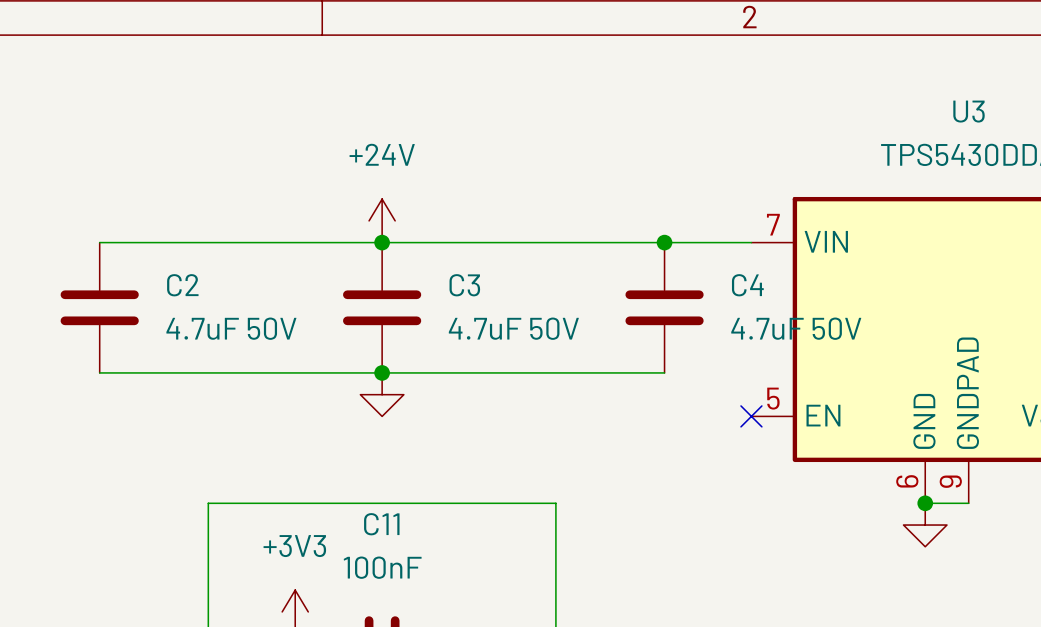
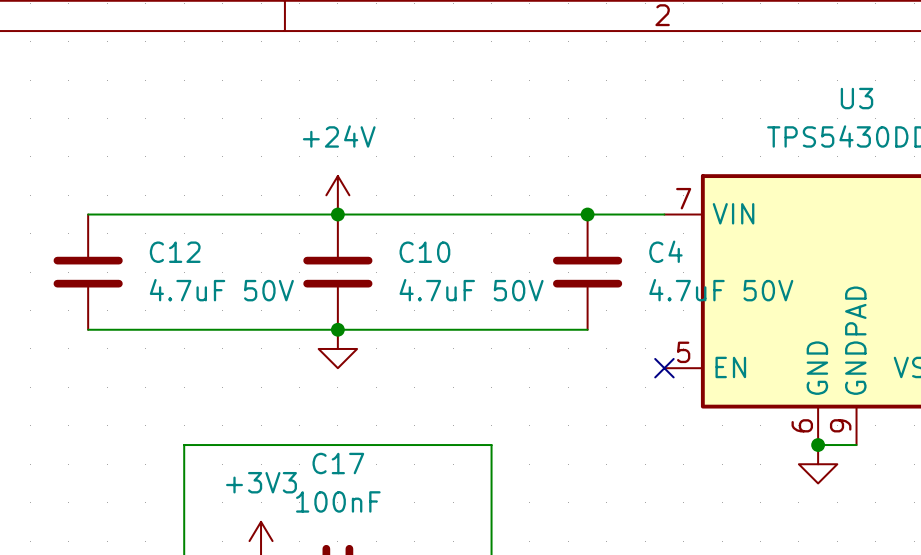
C2 name: C2 (182, 285) -> C12 (175, 252)
C3 name: C3 (464, 285) -> C10 (424, 252)
C11 name: C11 (381, 524) -> C17 (338, 463)

